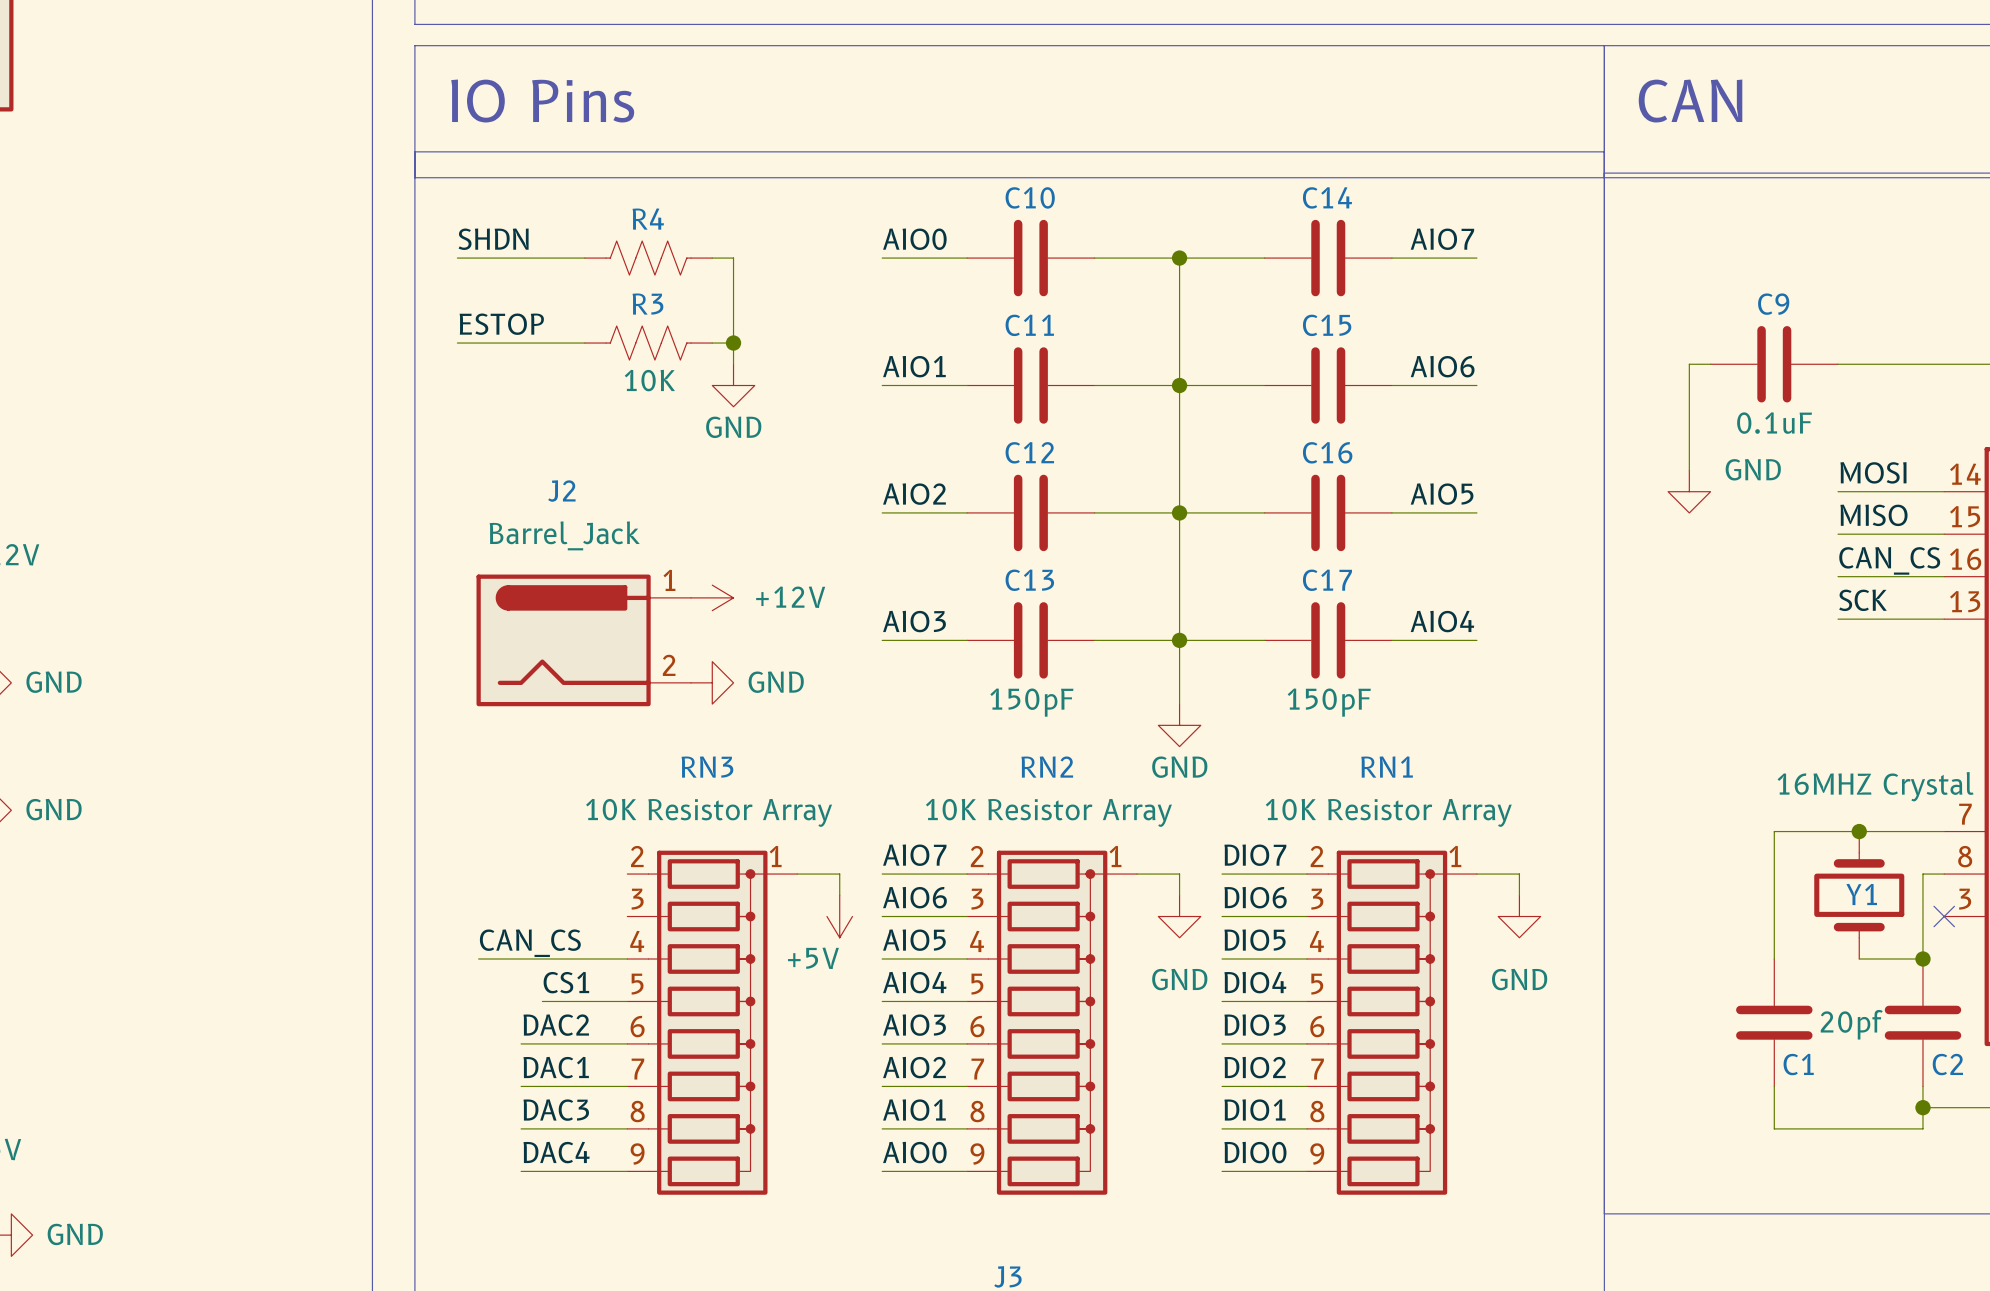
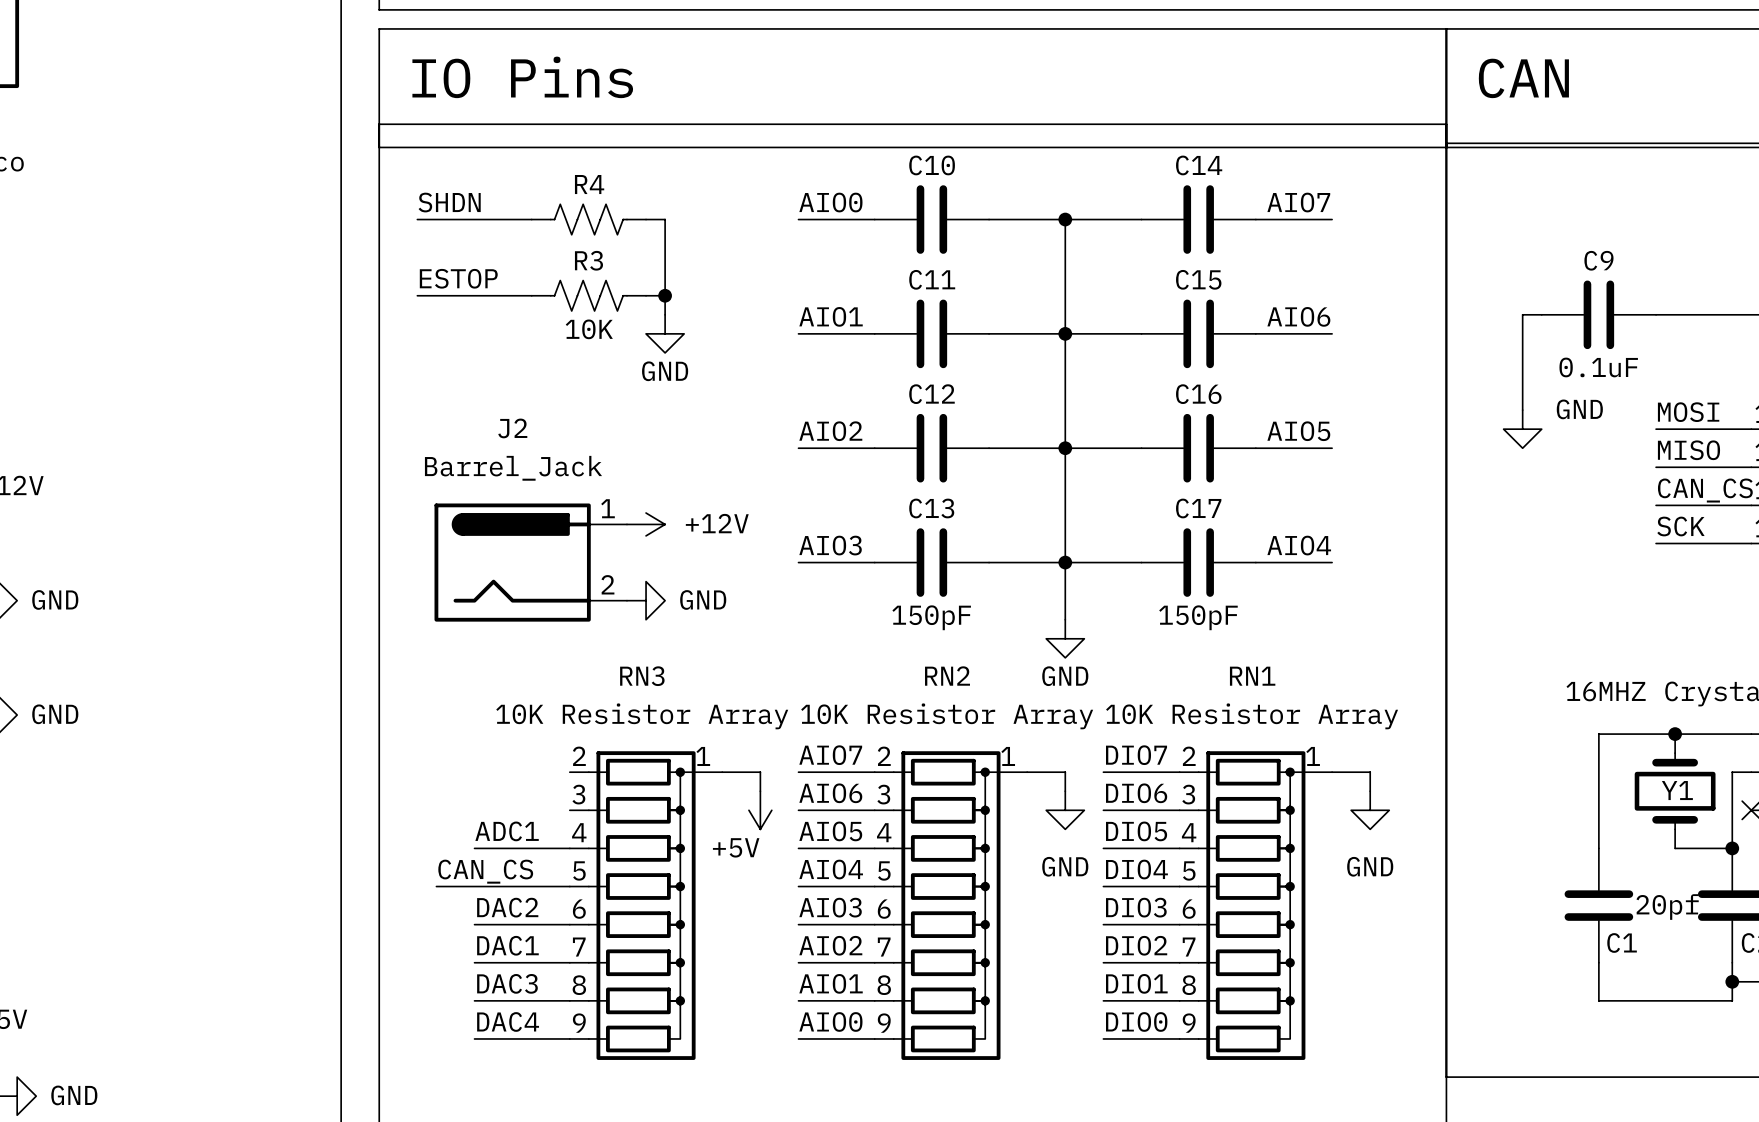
label: none -> ADC1 (507, 831)
label position: CAN_CS (530, 943) -> CAN_CS (485, 871)
wire: (478, 958) (521, 958) -> none
label: CS1 (566, 982) -> none
wire: none -> (436, 886) (493, 886)

